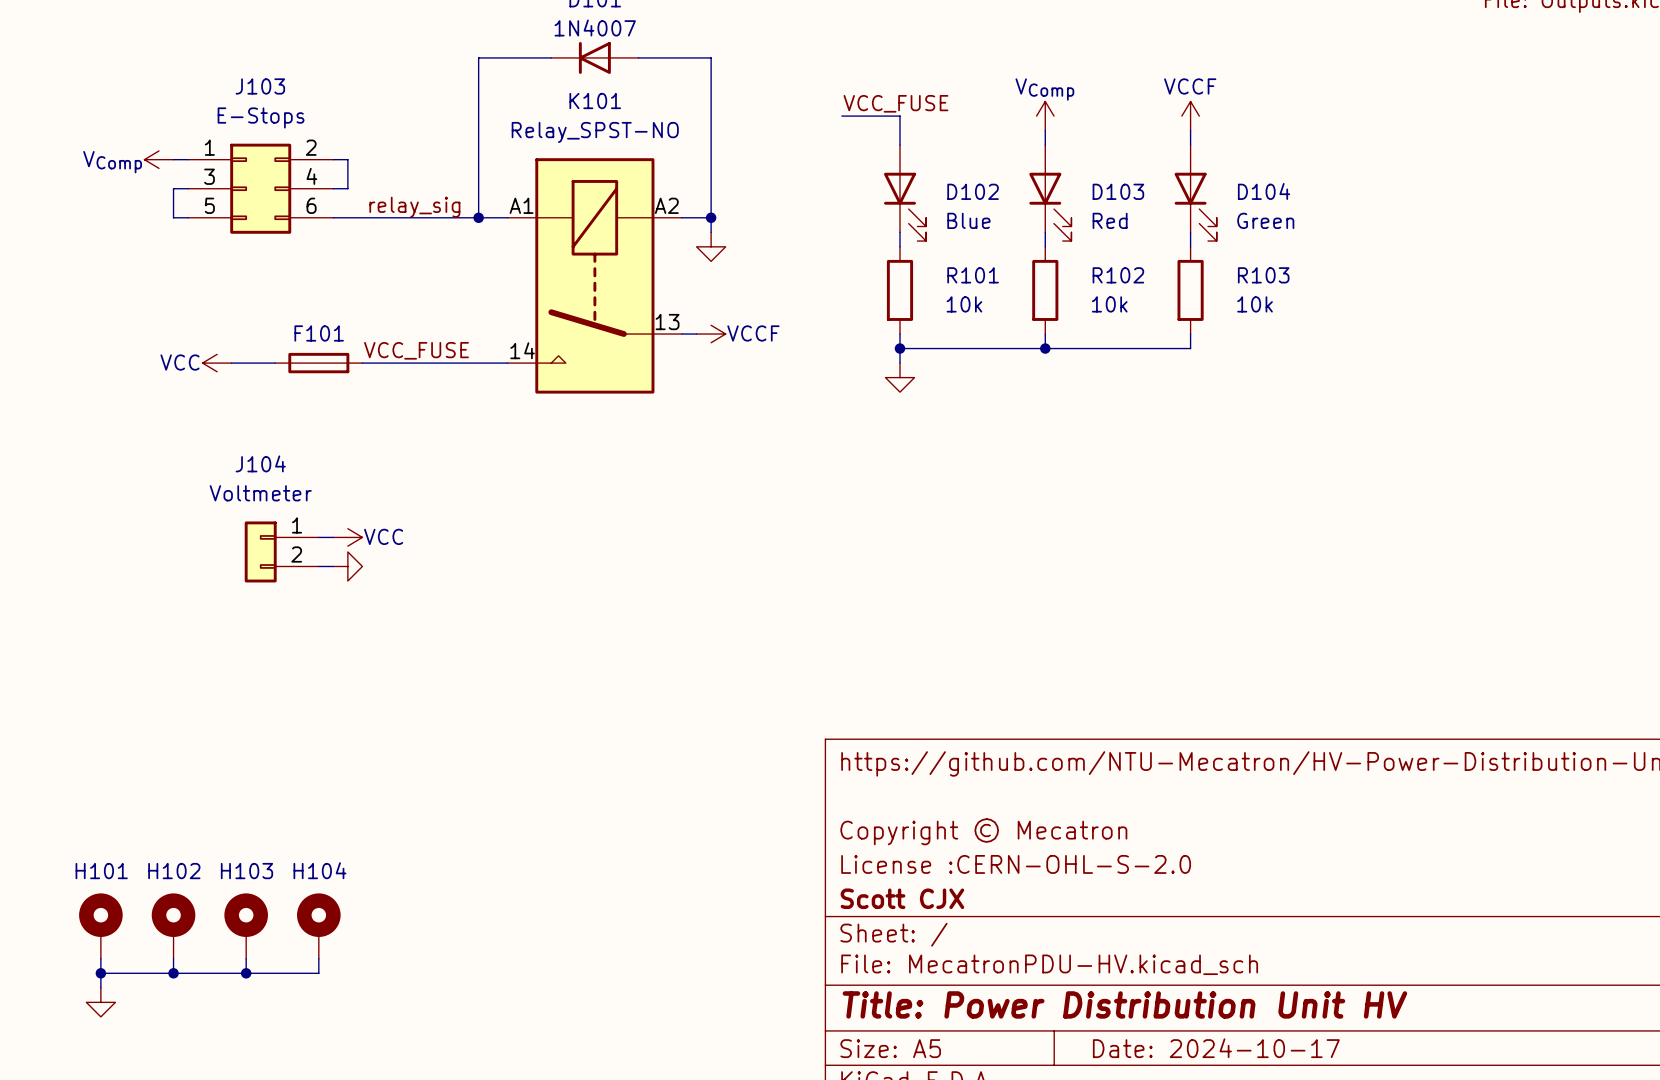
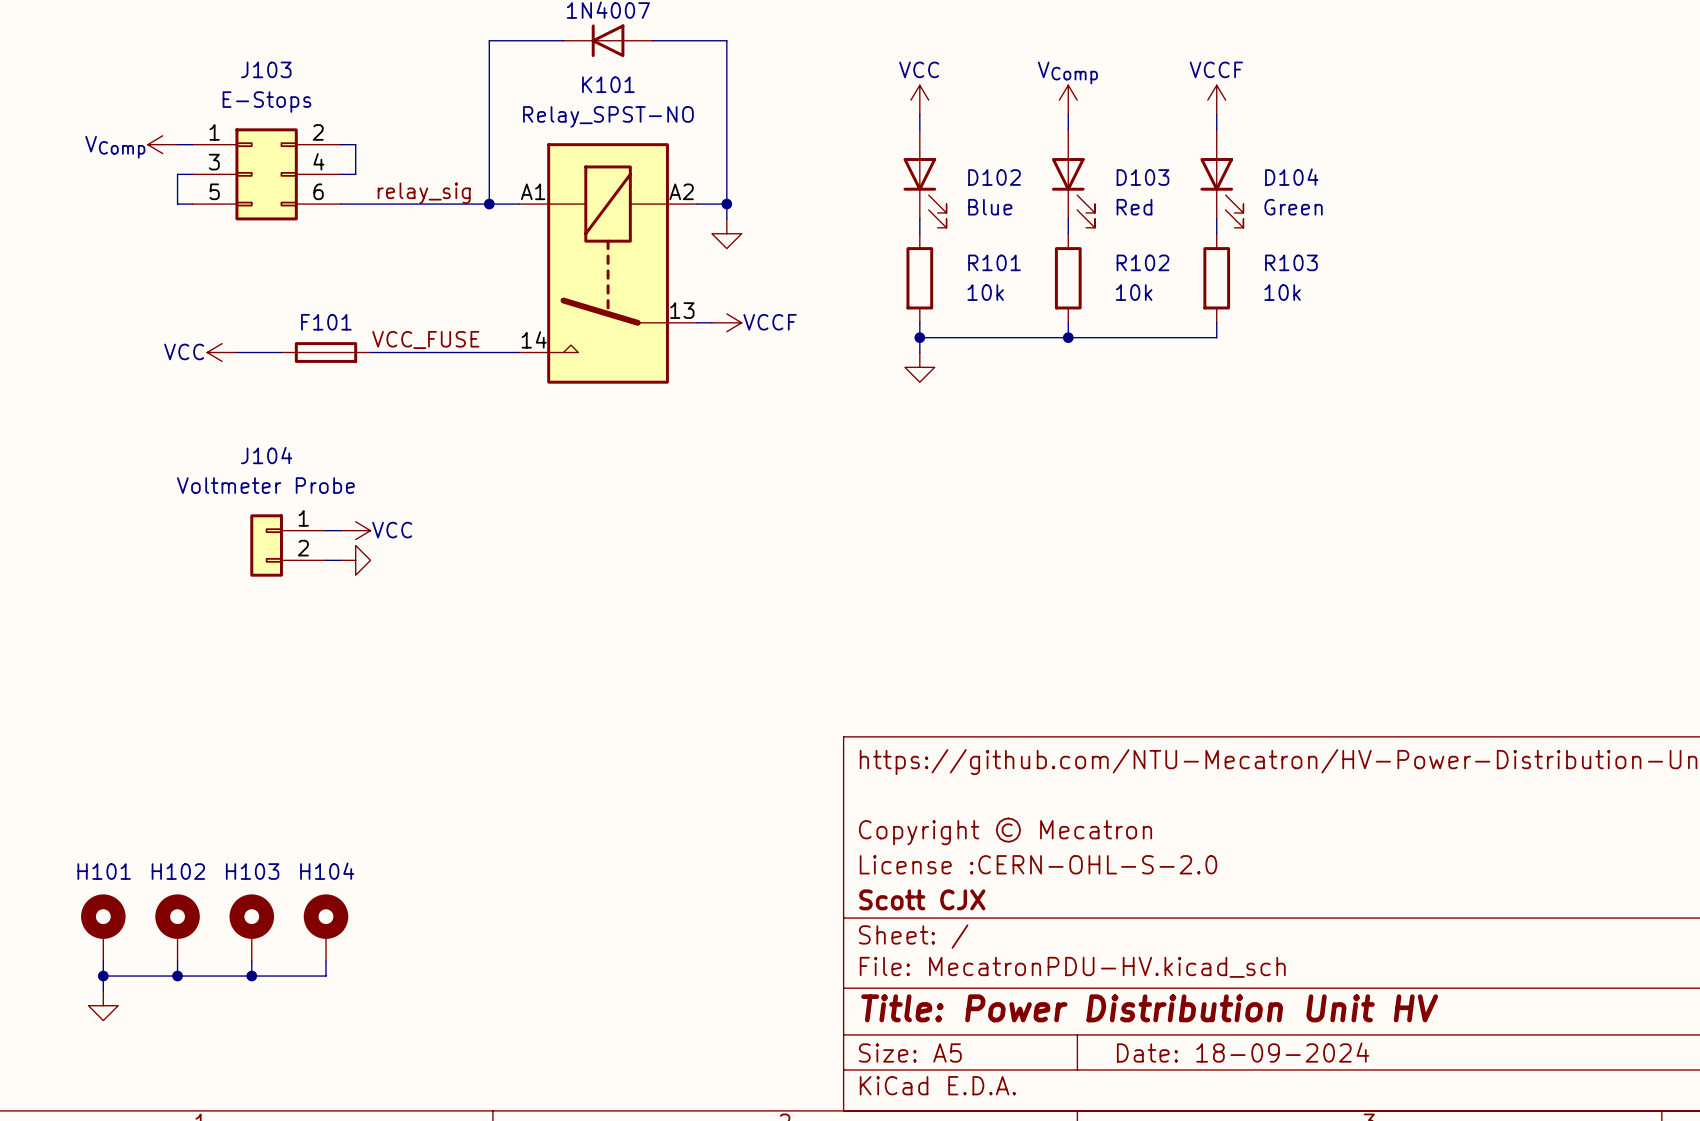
label: VCC_FUSE (895, 103) -> none
wire: (841, 116) (899, 116) (899, 130) -> none
power symbol: none -> VCC (919, 100)
J104 value: Voltmeter (260, 493) -> Voltmeter Probe (265, 485)
title block: Date: 2024-10-17 (1216, 1048) -> Date: 18-09-2024 (1243, 1052)

